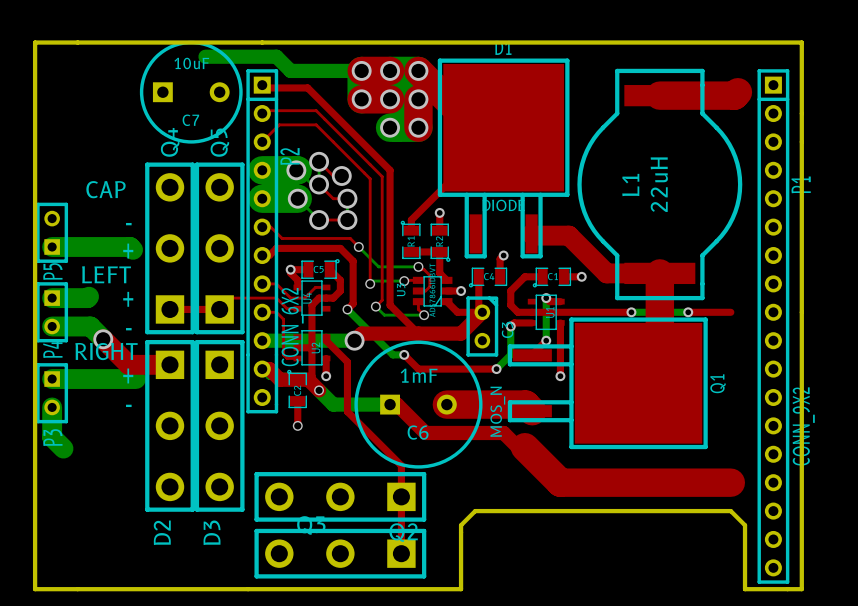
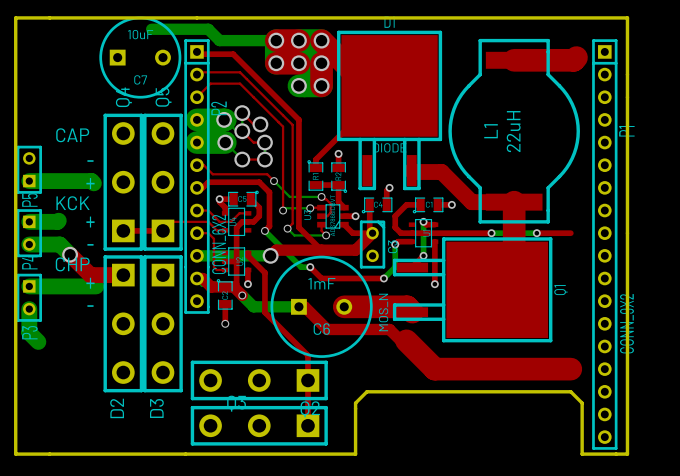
text: LEFT (106, 274) -> KCK (73, 203)
text: RIGHT (106, 351) -> CHP (72, 264)

